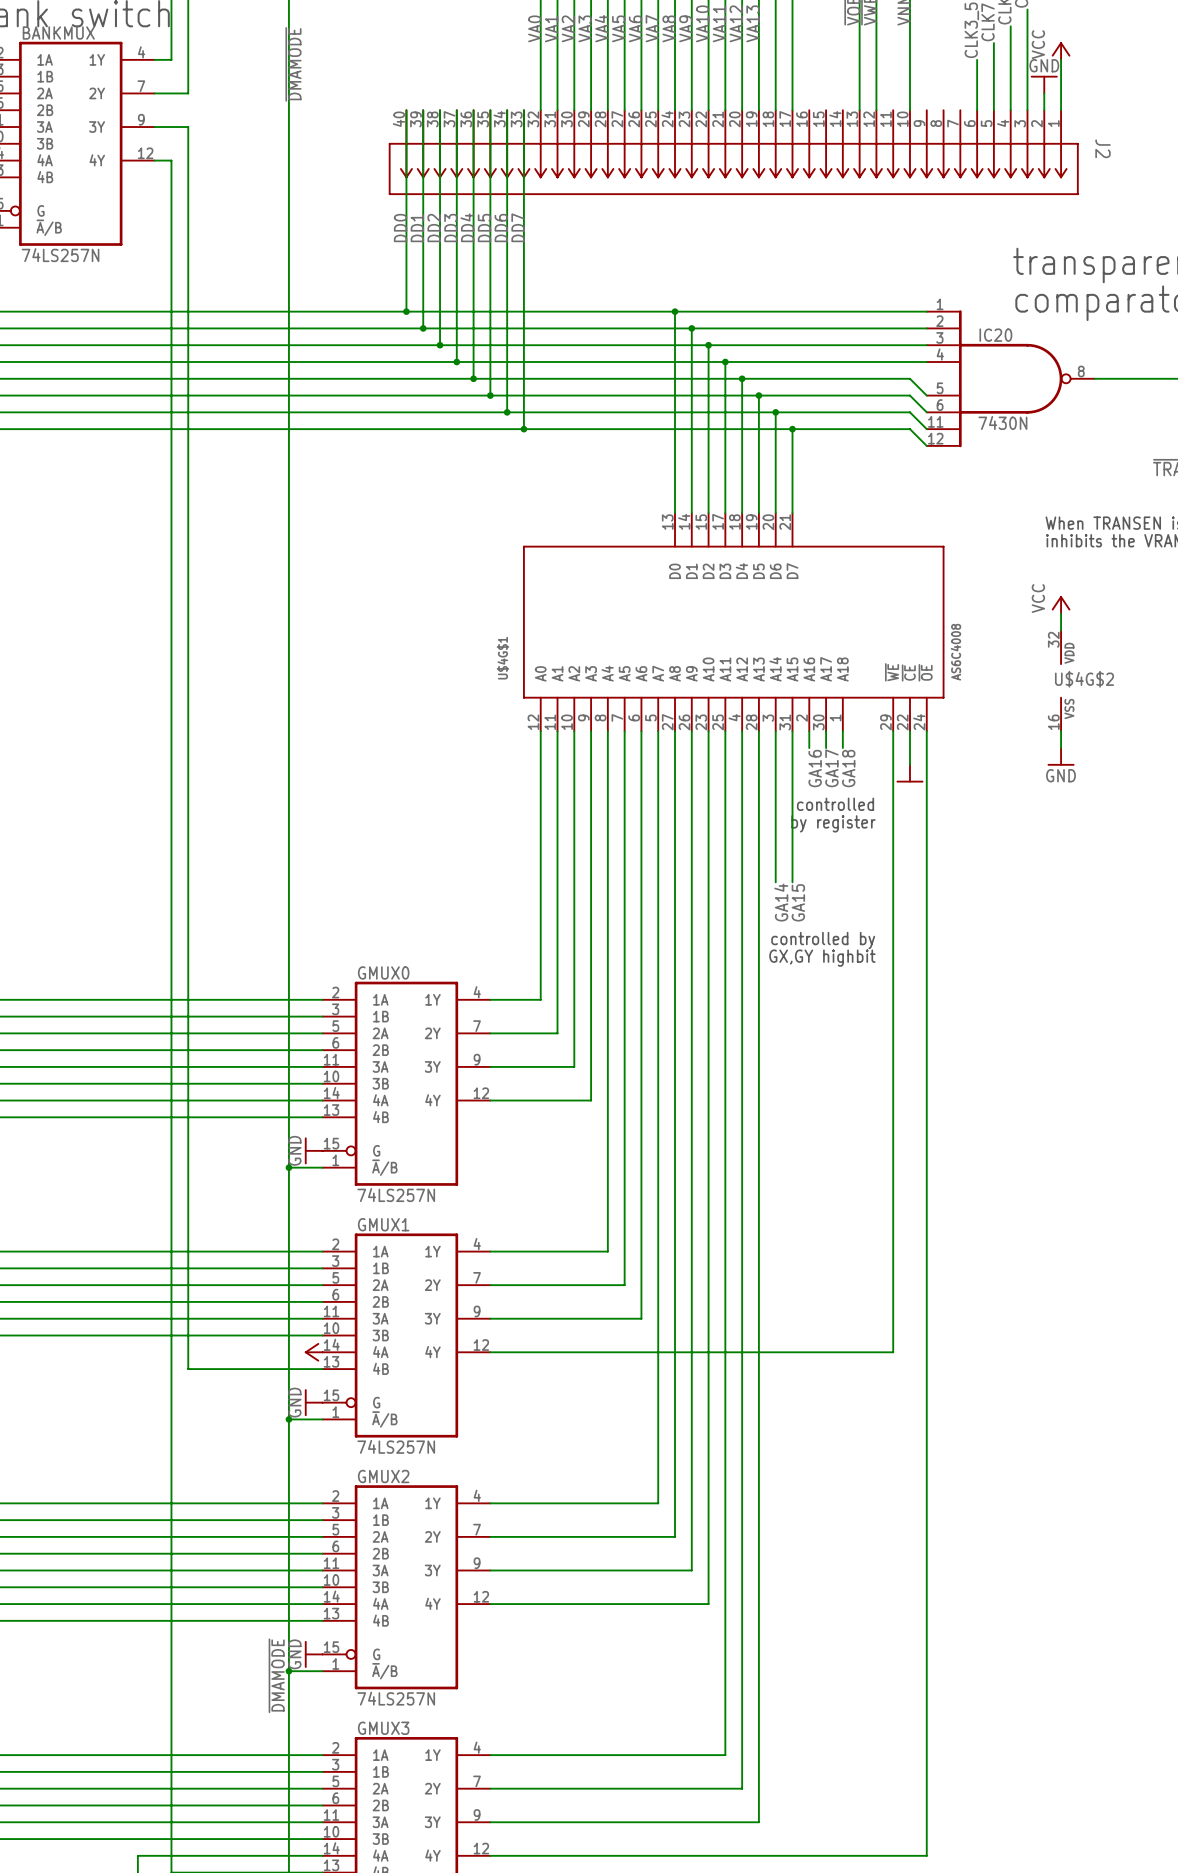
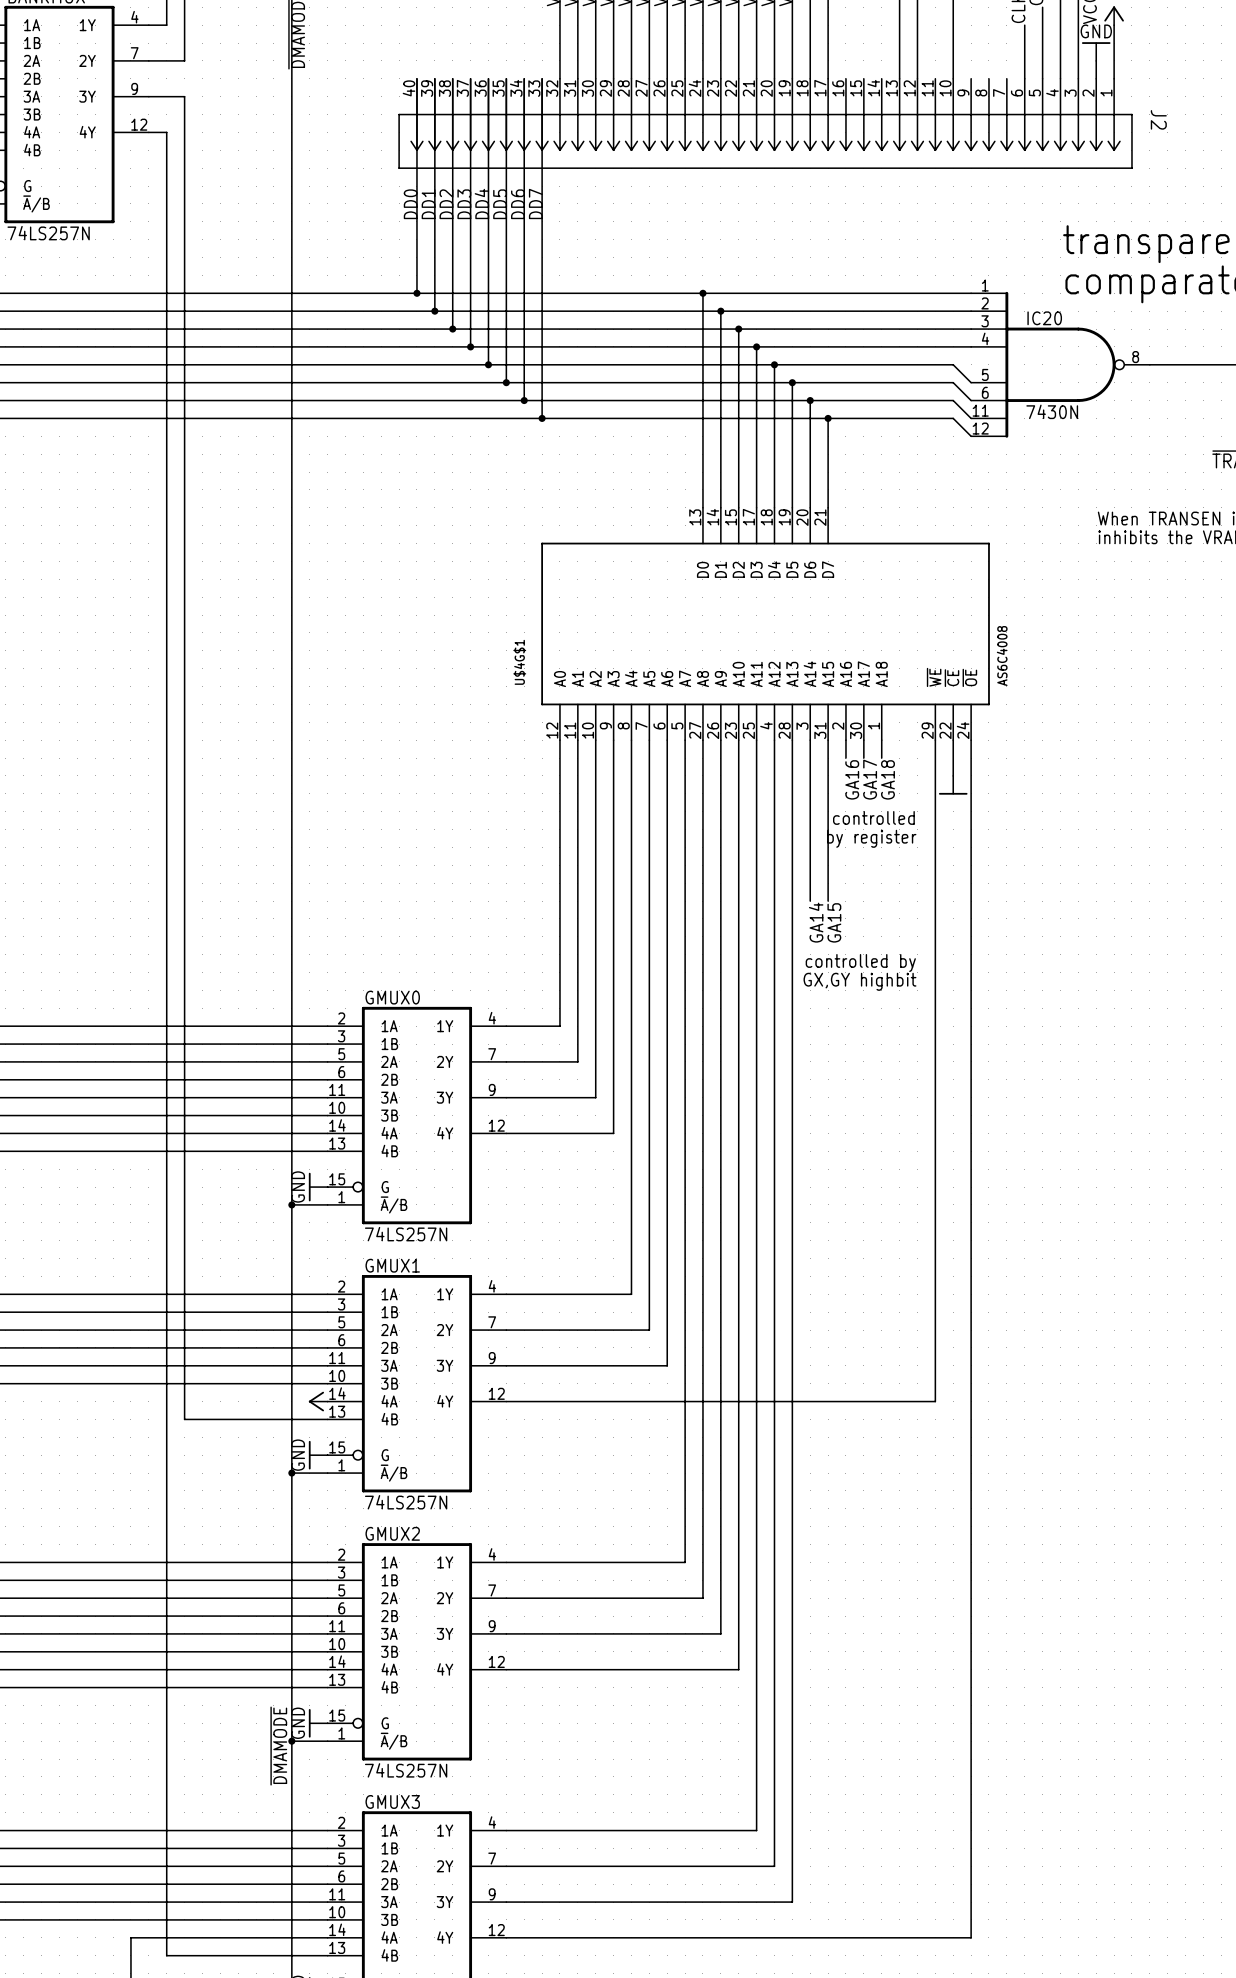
power symbol: VCC (1061, 604) -> none
wire: (1061, 613) (1061, 630) -> none
U$4G$2: (1061, 680) -> none
wire: (1061, 731) (1061, 748) -> none
power symbol: GND (1061, 756) -> none

